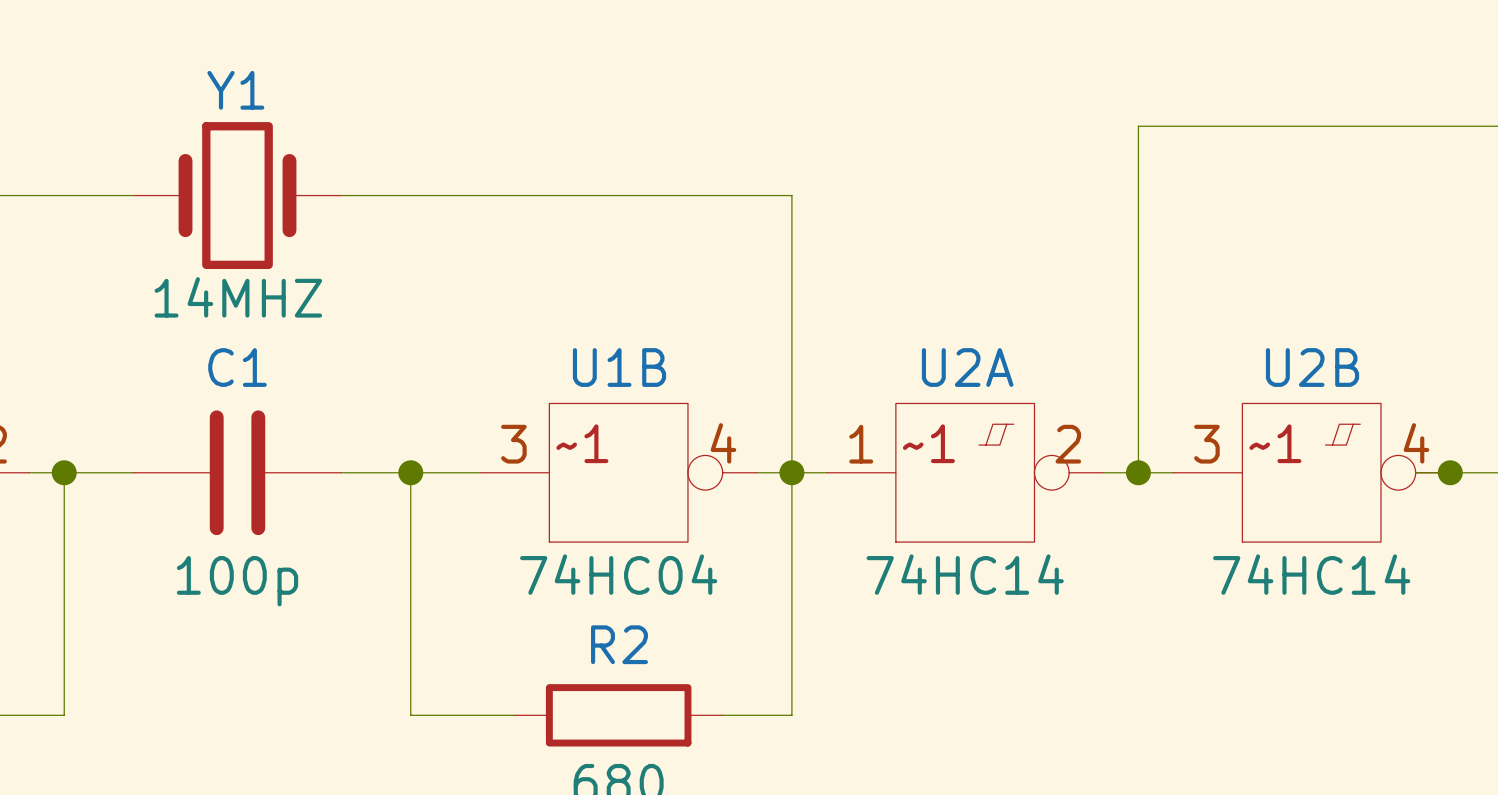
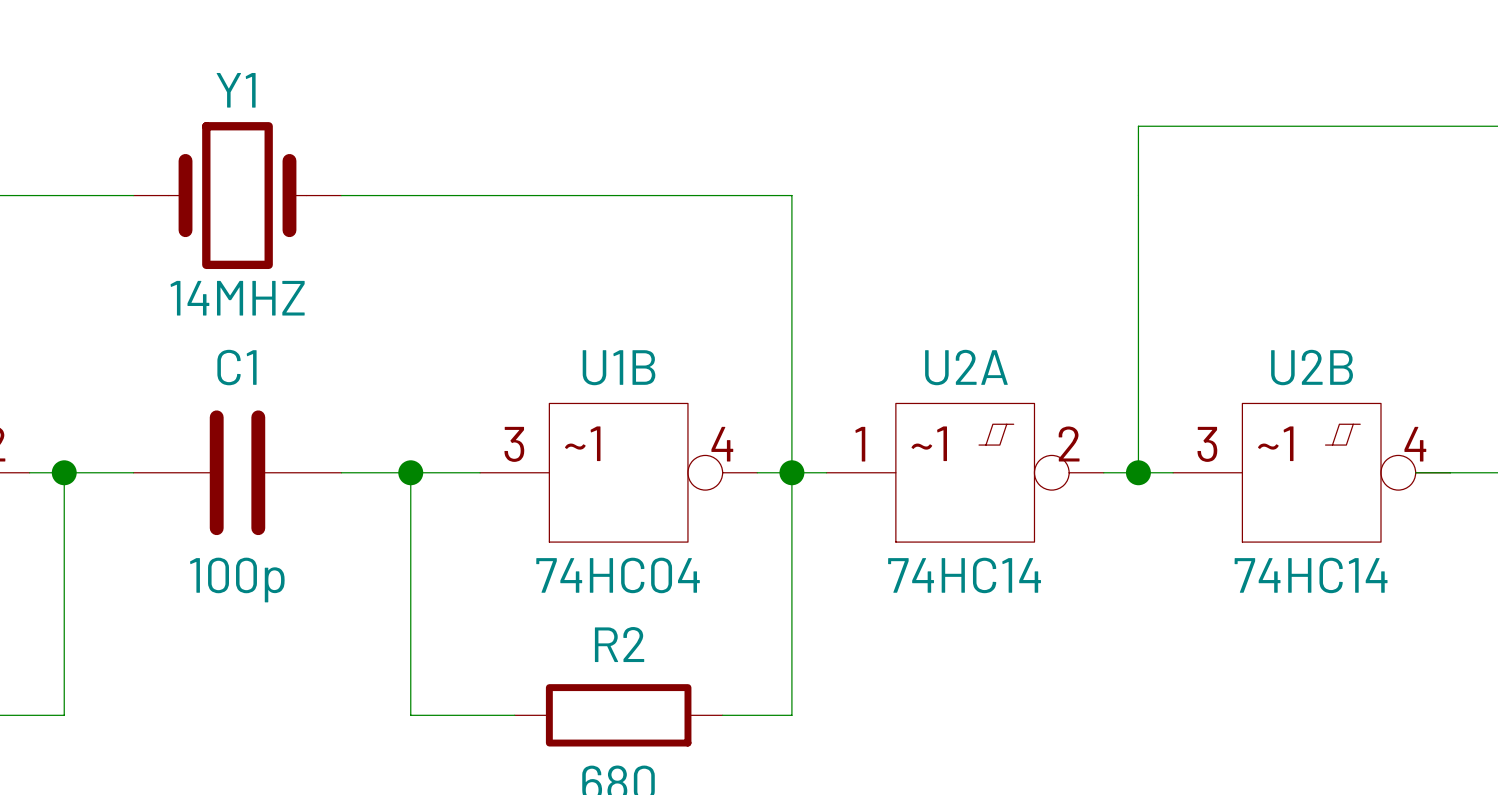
junction: (1450, 472) -> none

